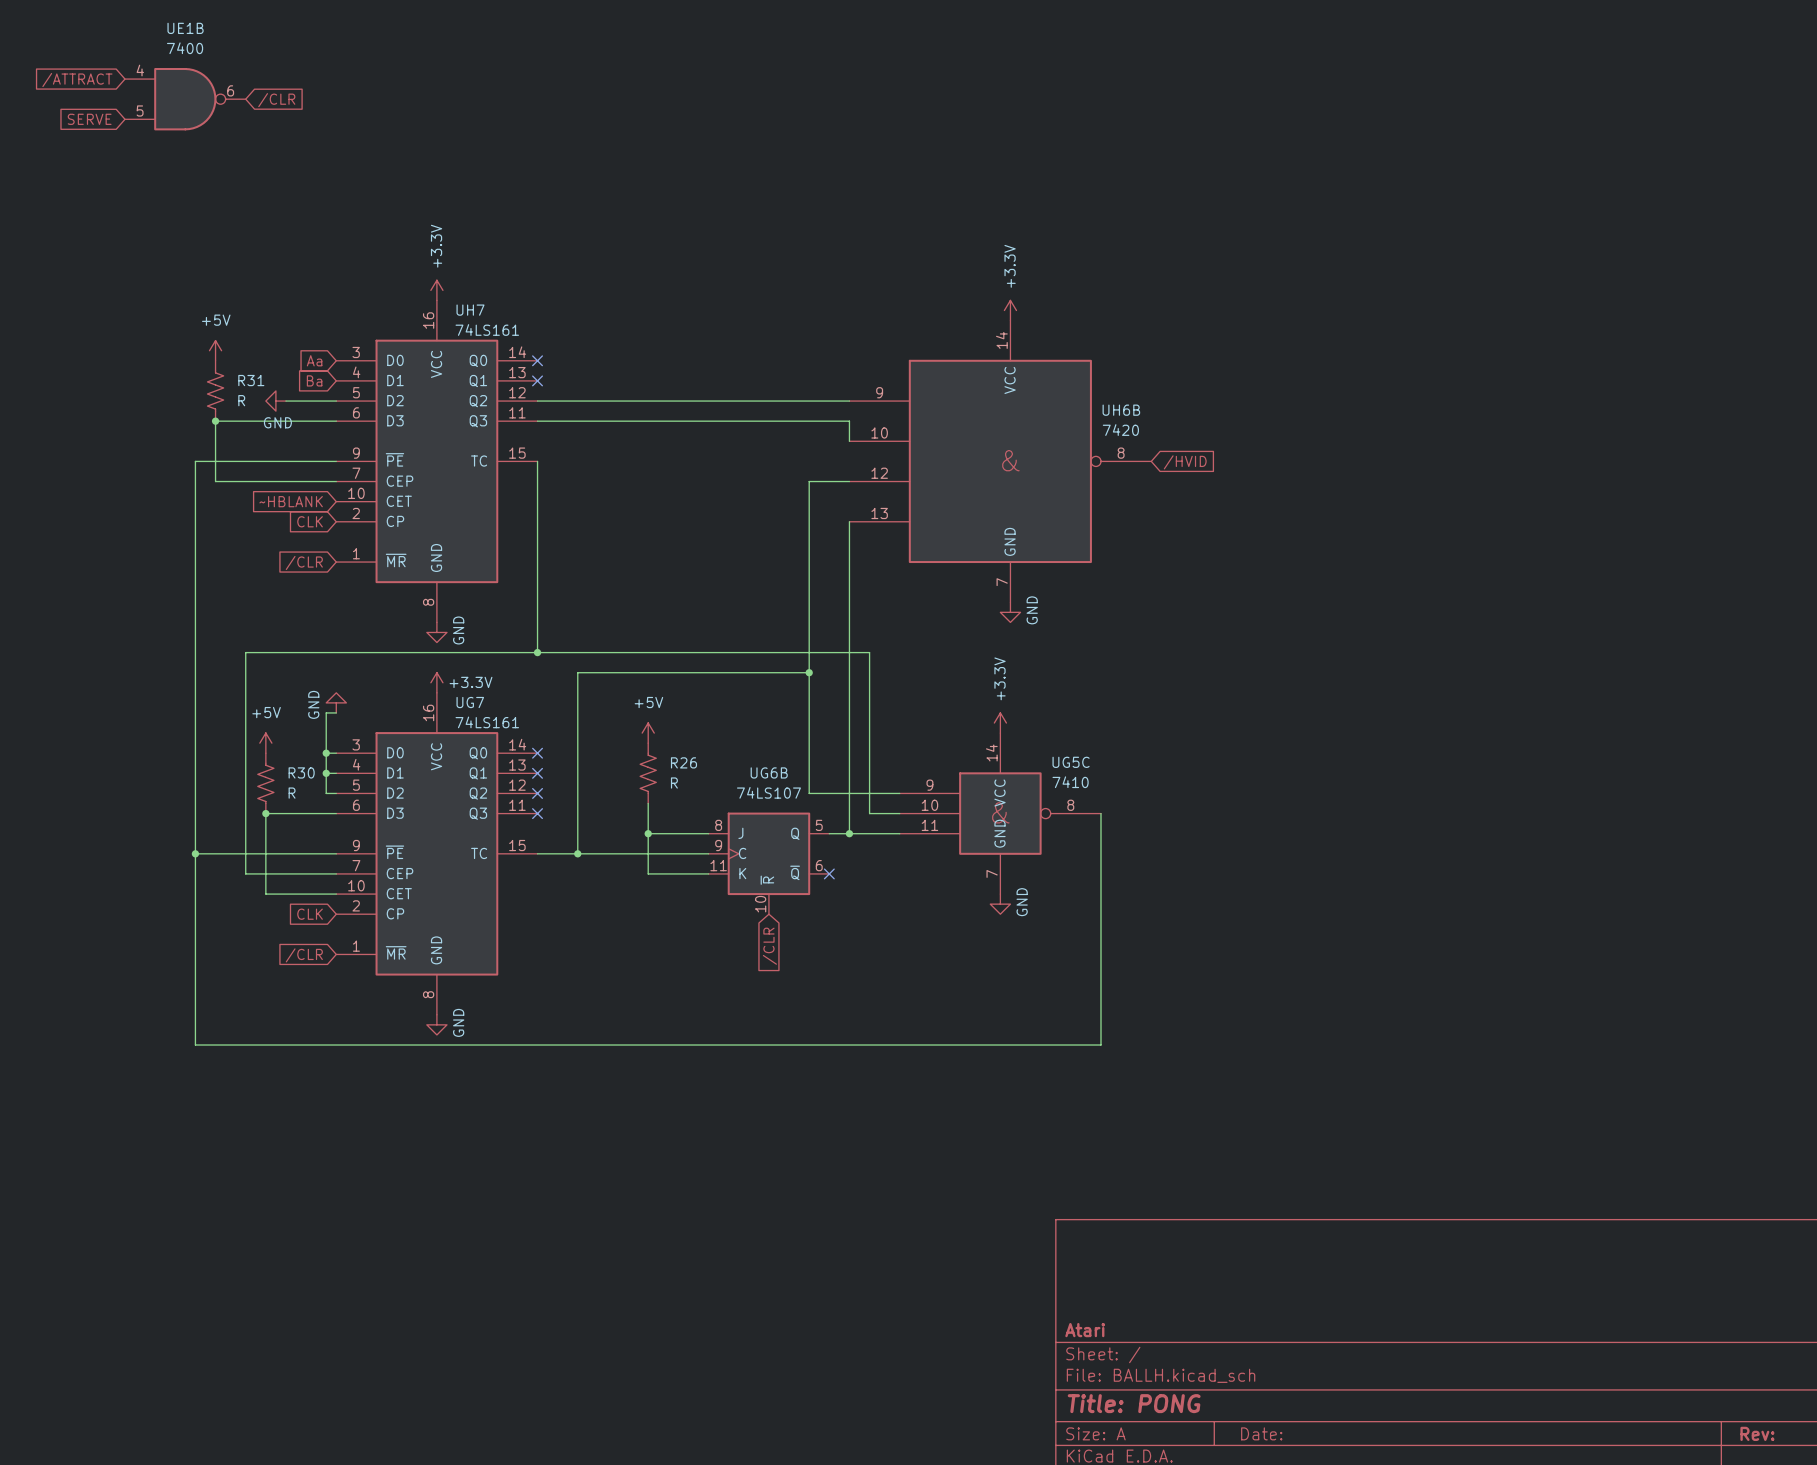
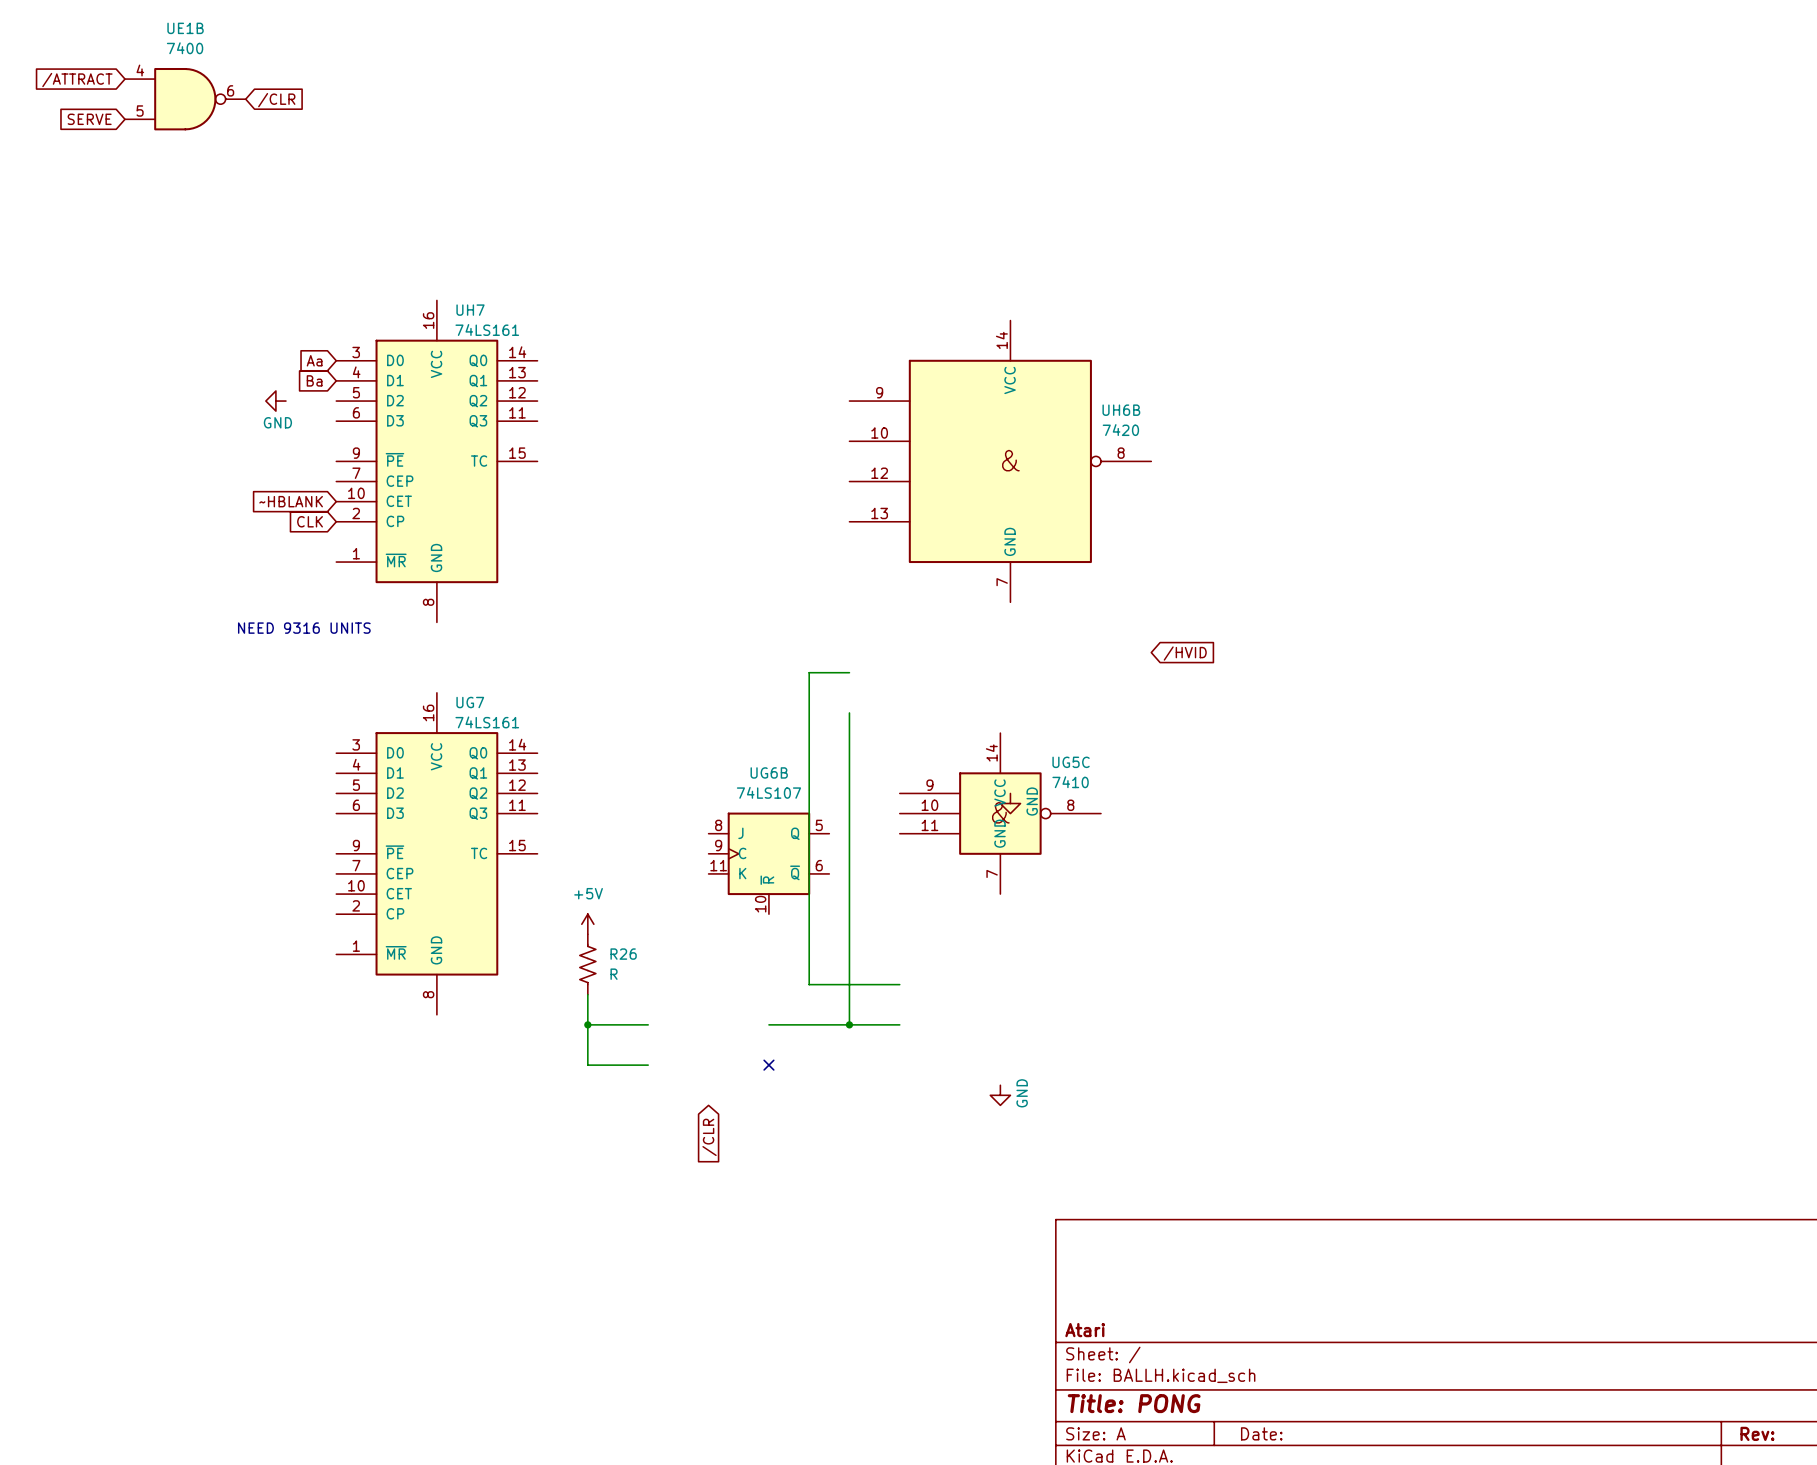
power symbol: +3.3V (436, 290) -> none
power symbol: +3.3V (1010, 310) -> none
power symbol: +5V (215, 350) -> none
no-connect mark: (537, 360) -> none
no-connect mark: (537, 380) -> none
R31: R (215, 390) -> none
wire: (285, 401) (336, 401) -> none
wire: (537, 401) (849, 401) -> none
junction: (215, 421) -> none
wire: (336, 421) (215, 421) (215, 481) (336, 481) -> none
wire: (537, 421) (849, 421) (849, 441) -> none
wire: (336, 461) (195, 461) (195, 1045) (1100, 1045) (1100, 813) -> none
wire: (537, 461) (537, 652) -> none
global label position: /HVID (1185, 462) -> /HVID (1185, 653)
wire: (849, 481) (809, 481) (809, 672) (577, 672) (577, 853) -> none
wire: (849, 521) (849, 712) -> none
global label: /CLR (304, 562) -> none
power symbol: GND (1010, 612) -> none
text: none -> NEED 9316 UNITS (304, 628)
power symbol: GND (436, 632) -> none
junction: (537, 652) -> none
wire: none -> (809, 672) (849, 672)
junction: (809, 672) -> none
power symbol: +3.3V (436, 682) -> none
power symbol: GND (336, 702) -> none
wire: (336, 712) (326, 712) (326, 793) (336, 793) -> none
power symbol: +3.3V (1000, 723) -> none
power symbol: +5V (648, 733) -> none
power symbol: +5V (265, 743) -> none
wire: (326, 753) (336, 753) -> none
junction: (326, 753) -> none
no-connect mark: (537, 753) -> none
wire: (326, 773) (336, 773) -> none
junction: (326, 773) -> none
no-connect mark: (537, 773) -> none
R26 position: (648, 773) -> (587, 964)
R30: R (265, 783) -> none
no-connect mark: (537, 793) -> none
wire: (809, 793) (899, 793) -> (809, 793) (809, 984) (899, 984)
wire: (648, 803) (648, 873) (708, 873) -> none
power symbol: none -> GND (1010, 803)
junction: (265, 813) -> none
wire: (336, 813) (265, 813) (265, 894) (336, 894) -> none
no-connect mark: (537, 813) -> none
wire: (899, 813) (869, 813) (869, 652) (245, 652) (245, 873) (336, 873) -> none
wire: (648, 833) (708, 833) -> none
junction: (648, 833) -> none
wire: (829, 833) (899, 833) -> none
wire: none -> (849, 833) (849, 1024)
junction: (849, 833) -> none
wire: (195, 853) (336, 853) -> none
junction: (195, 853) -> none
wire: (537, 853) (708, 853) -> none
junction: (577, 853) -> none
no-connect mark: (829, 873) -> none
power symbol: GND (1000, 904) -> none
global label: CLK (310, 914) -> none
power symbol: none -> +5V (587, 924)
global label: /CLR (769, 946) -> none
global label: /CLR (304, 955) -> none
wire: none -> (587, 994) (587, 1065) (648, 1065)
power symbol: GND (436, 1024) -> none
wire: none -> (587, 1024) (648, 1024)
junction: none -> (587, 1024)
wire: none -> (768, 1024) (899, 1024)
junction: none -> (849, 1024)
no-connect mark: none -> (768, 1065)
power symbol: none -> GND (1000, 1095)
global label: none -> /CLR (709, 1137)

